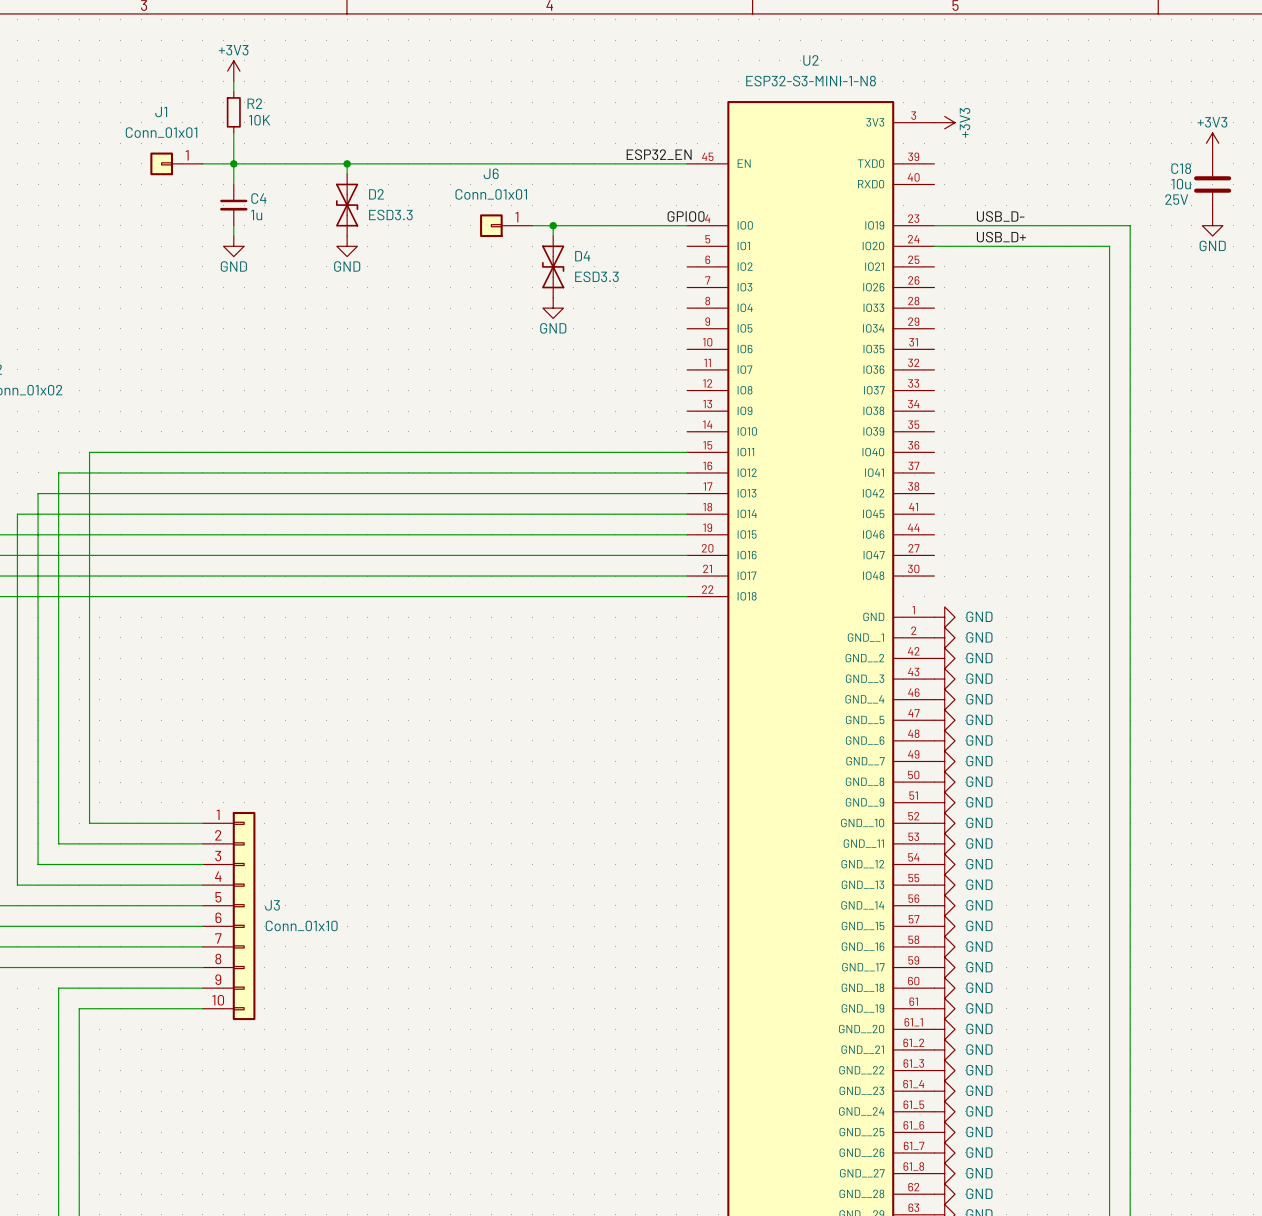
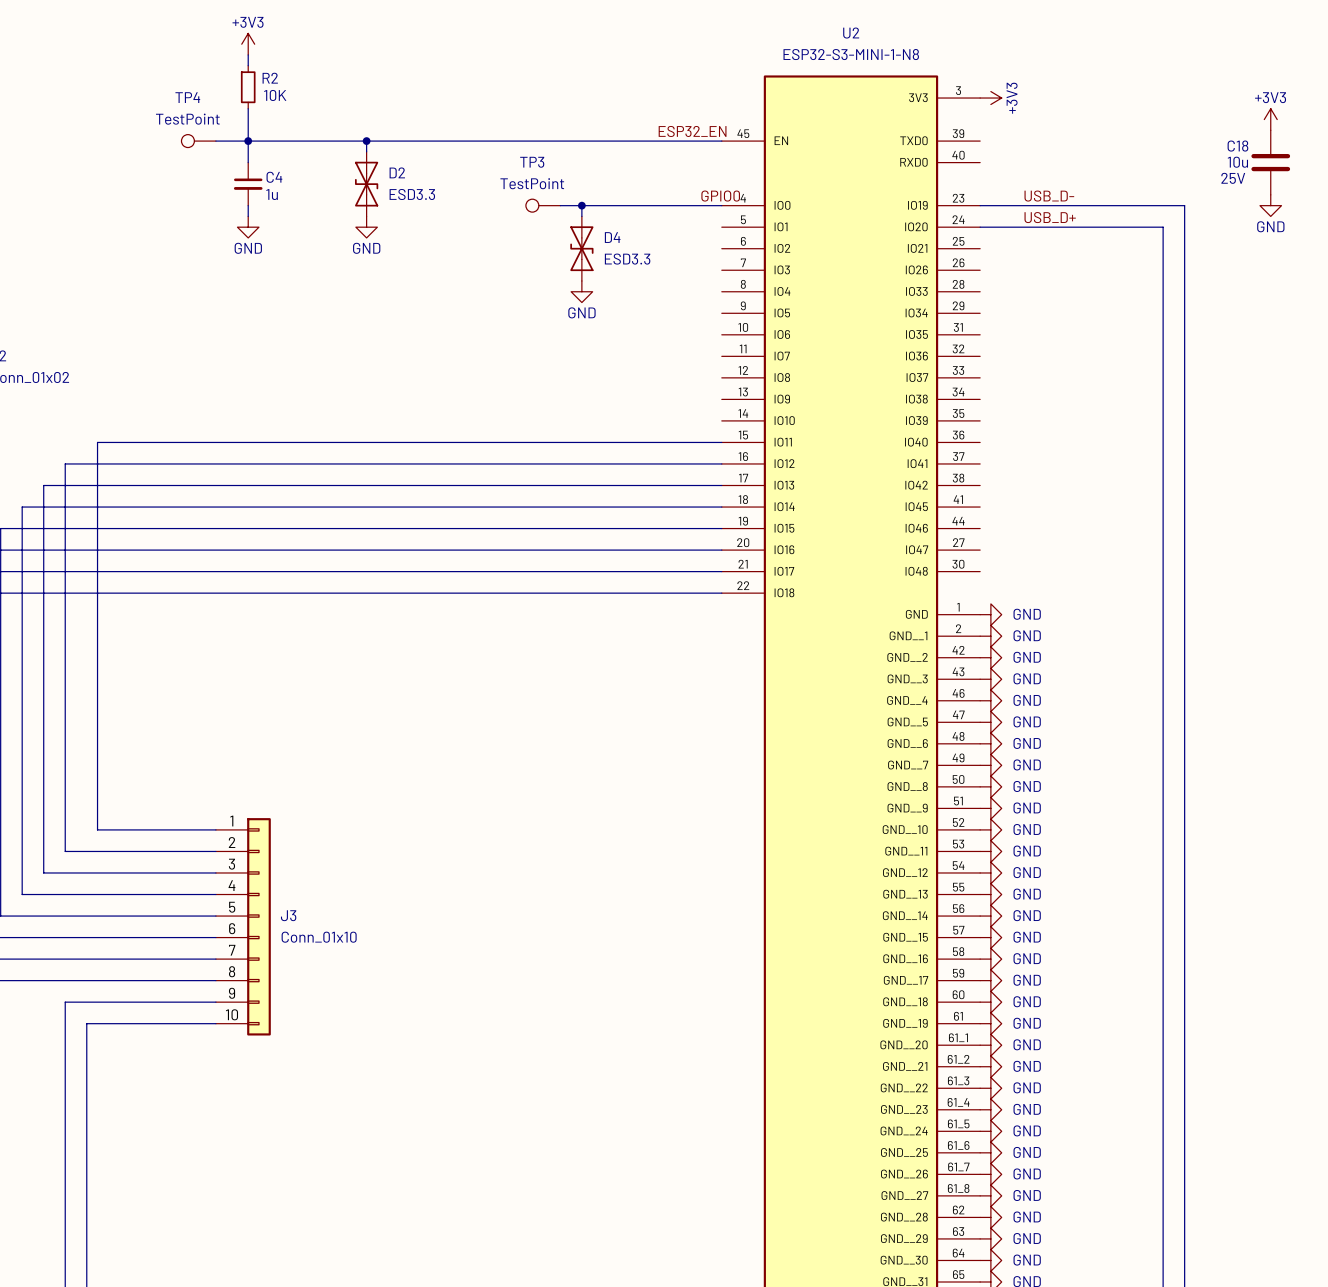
J1: Conn_01x01 (176, 163) -> none
TP4: none -> TestPoint (198, 141)
J6: Conn_01x01 (506, 225) -> none
TP3: none -> TestPoint (543, 205)

